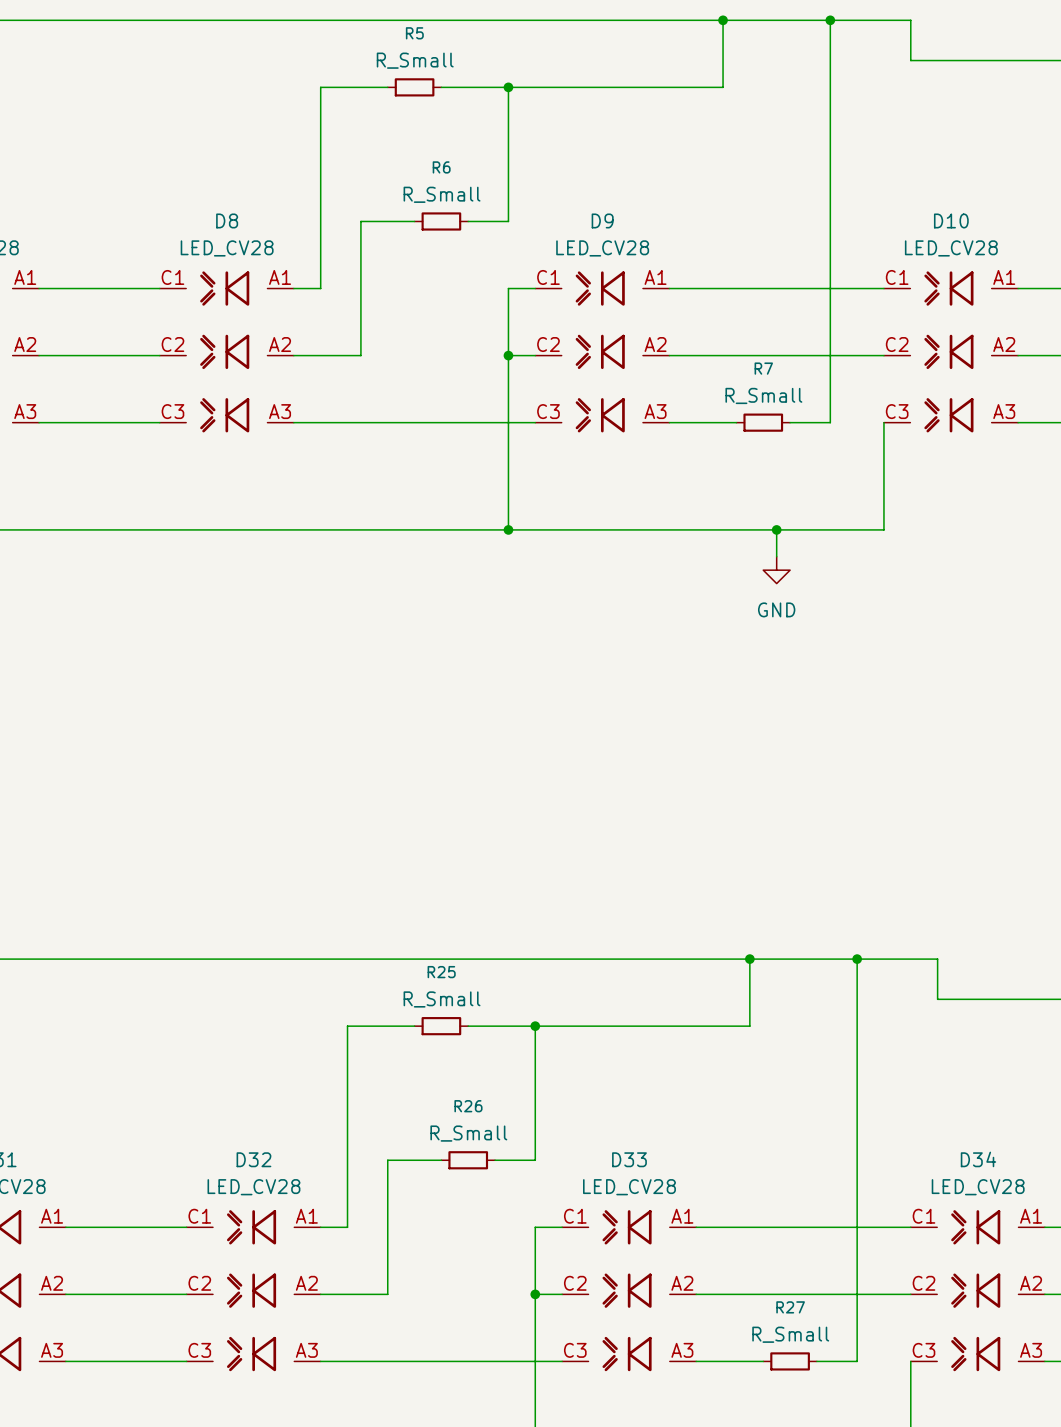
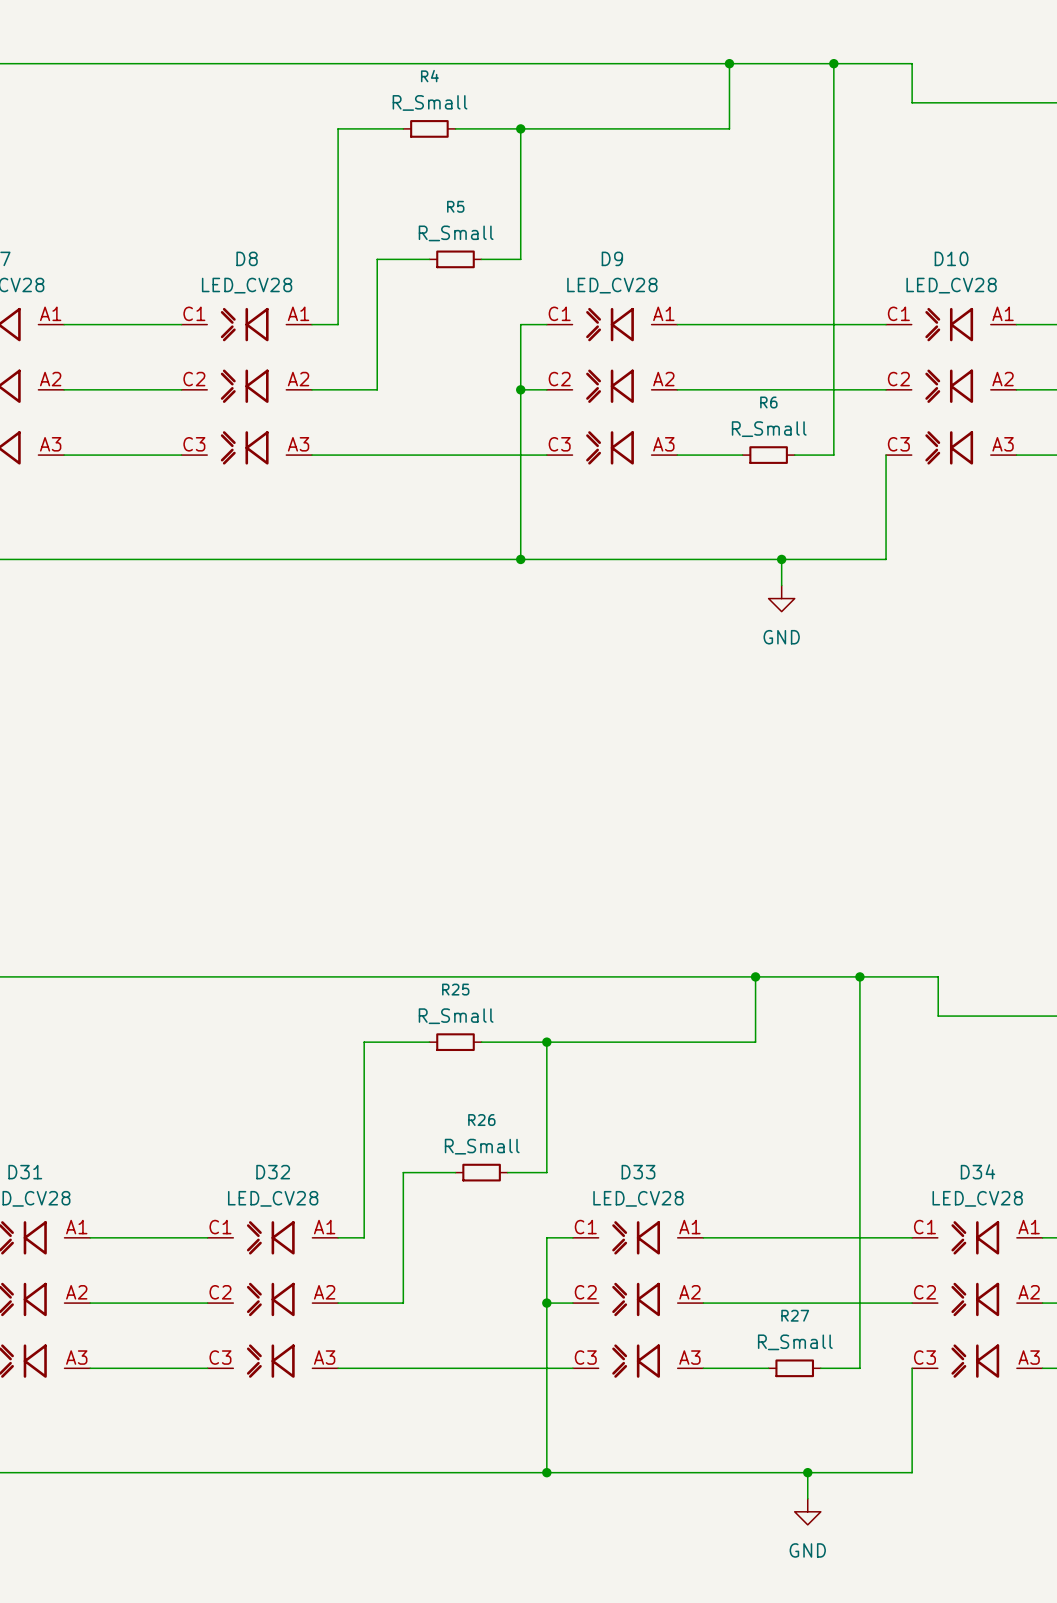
R5 name: R5 (414, 33) -> R4 (429, 76)
R6 name: R6 (441, 167) -> R5 (455, 206)
R7 name: R7 (763, 368) -> R6 (768, 402)

